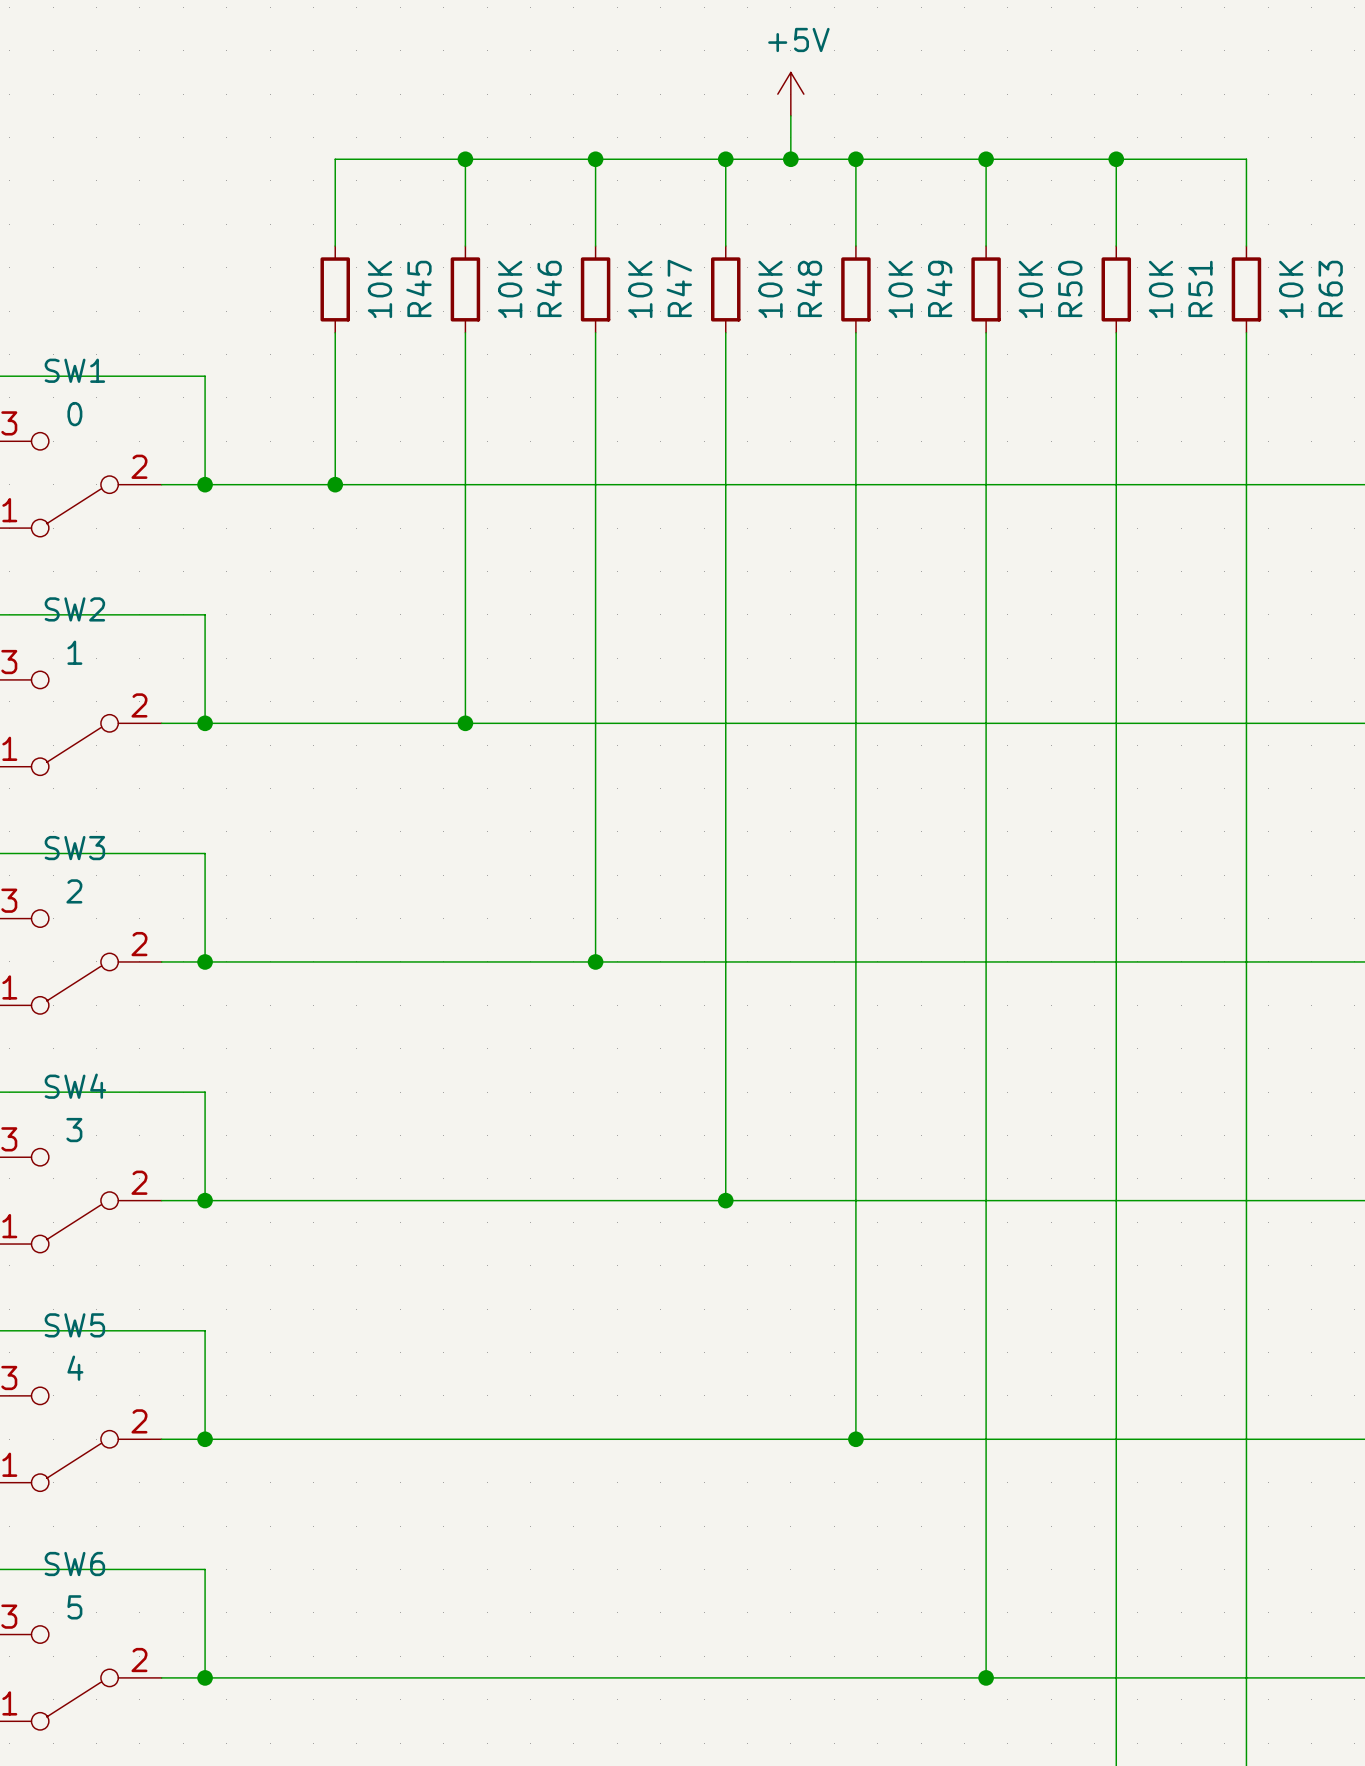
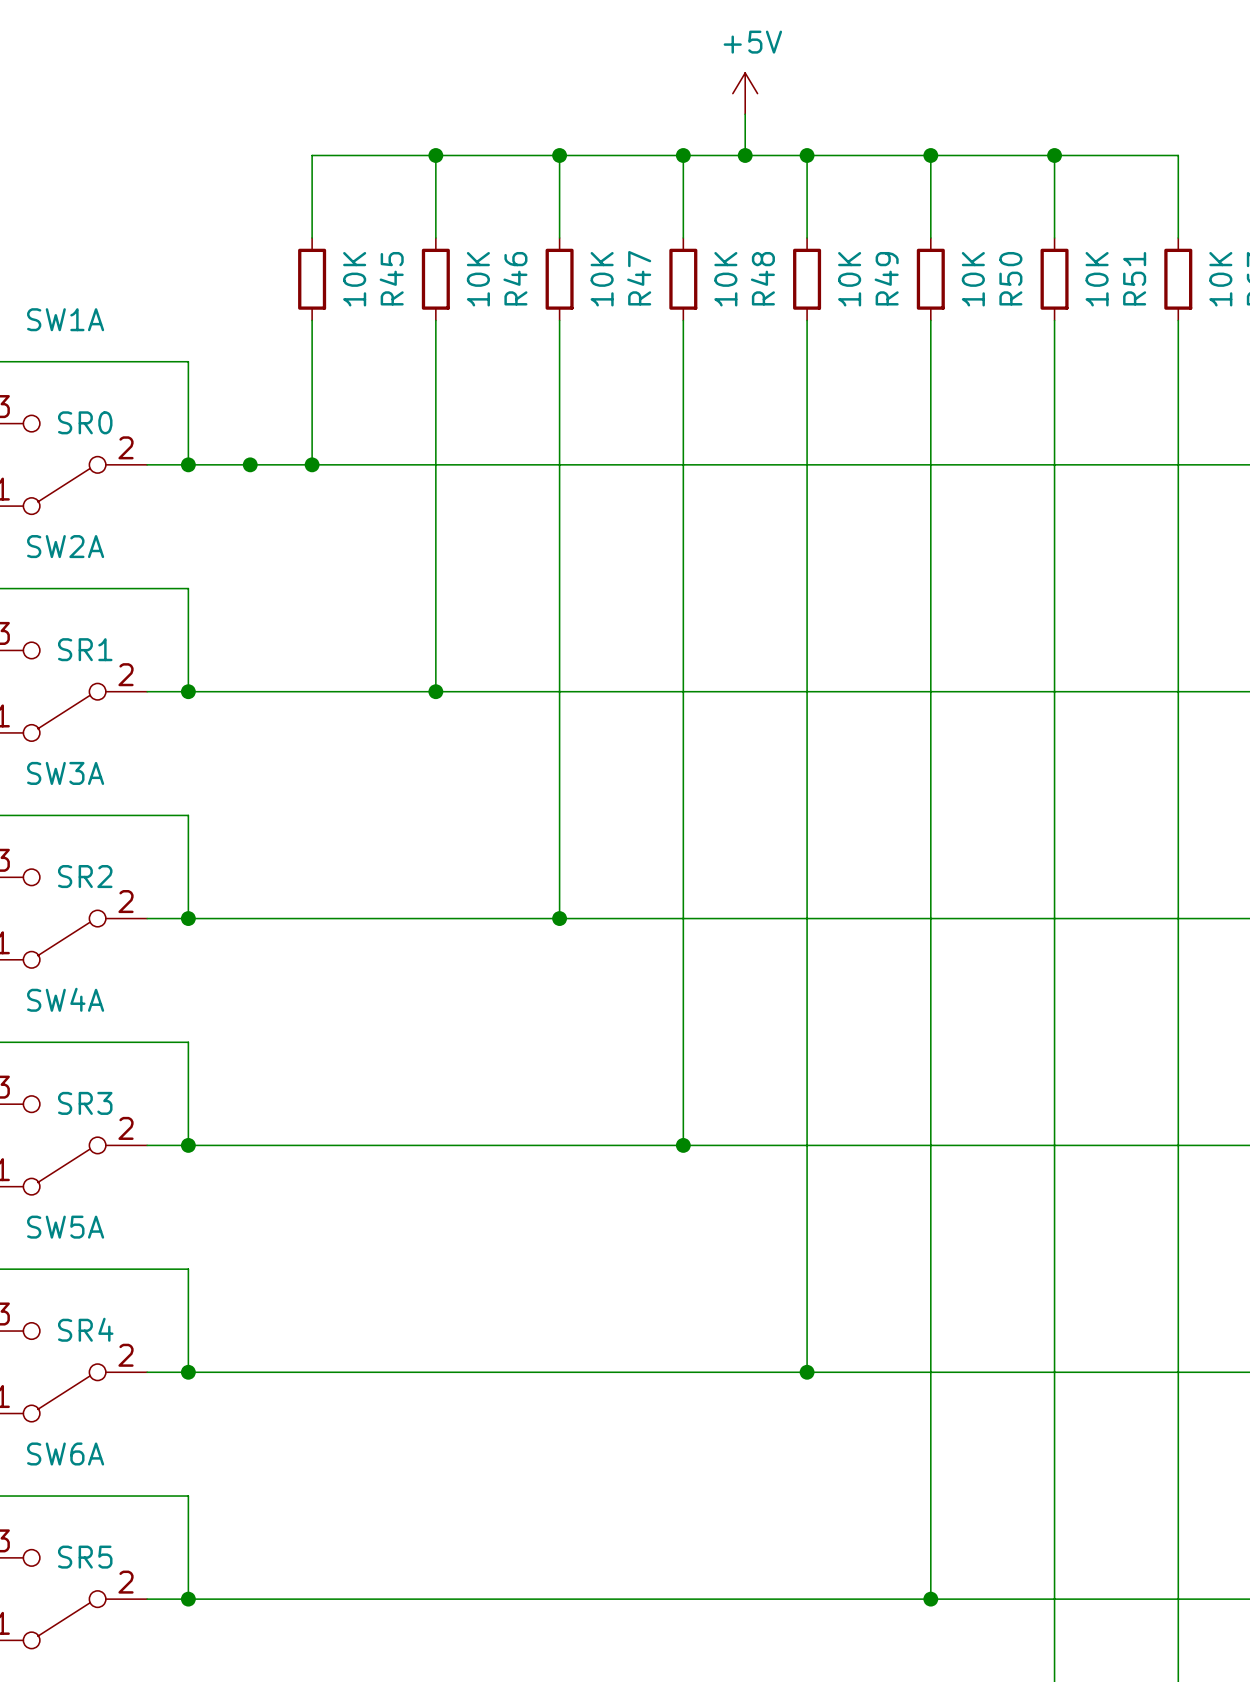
SW1 name: SW1 (74, 370) -> SW1A (65, 319)
SW1 value: 0 (74, 414) -> SR0 (85, 422)
junction: none -> (250, 464)
SW2 name: SW2 (74, 609) -> SW2A (65, 546)
SW2 value: 1 (74, 652) -> SR1 (85, 649)
SW3 name: SW3 (74, 848) -> SW3A (65, 773)
SW3 value: 2 (74, 891) -> SR2 (85, 876)
SW4 name: SW4 (75, 1086) -> SW4A (65, 999)
SW4 value: 3 (74, 1130) -> SR3 (85, 1103)
SW5 name: SW5 (74, 1325) -> SW5A (65, 1227)
SW5 value: 4 (75, 1368) -> SR4 (85, 1329)
SW6 name: SW6 (74, 1564) -> SW6A (65, 1453)
SW6 value: 5 (74, 1607) -> SR5 (85, 1557)

